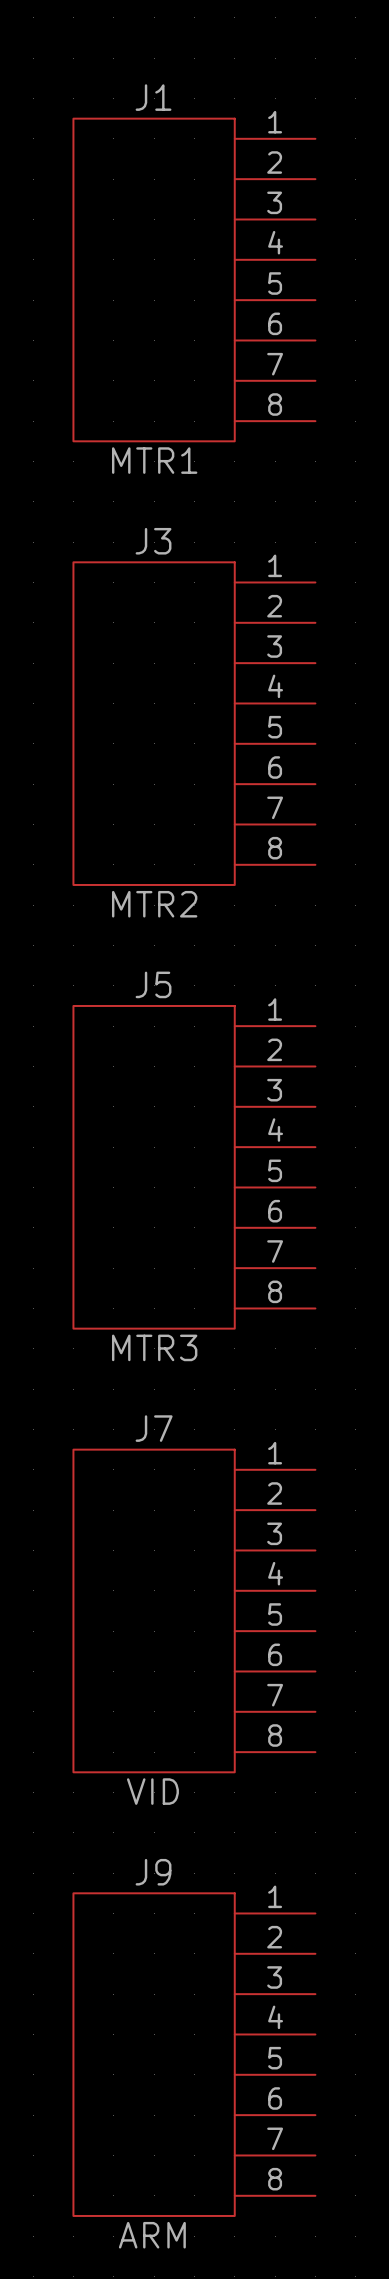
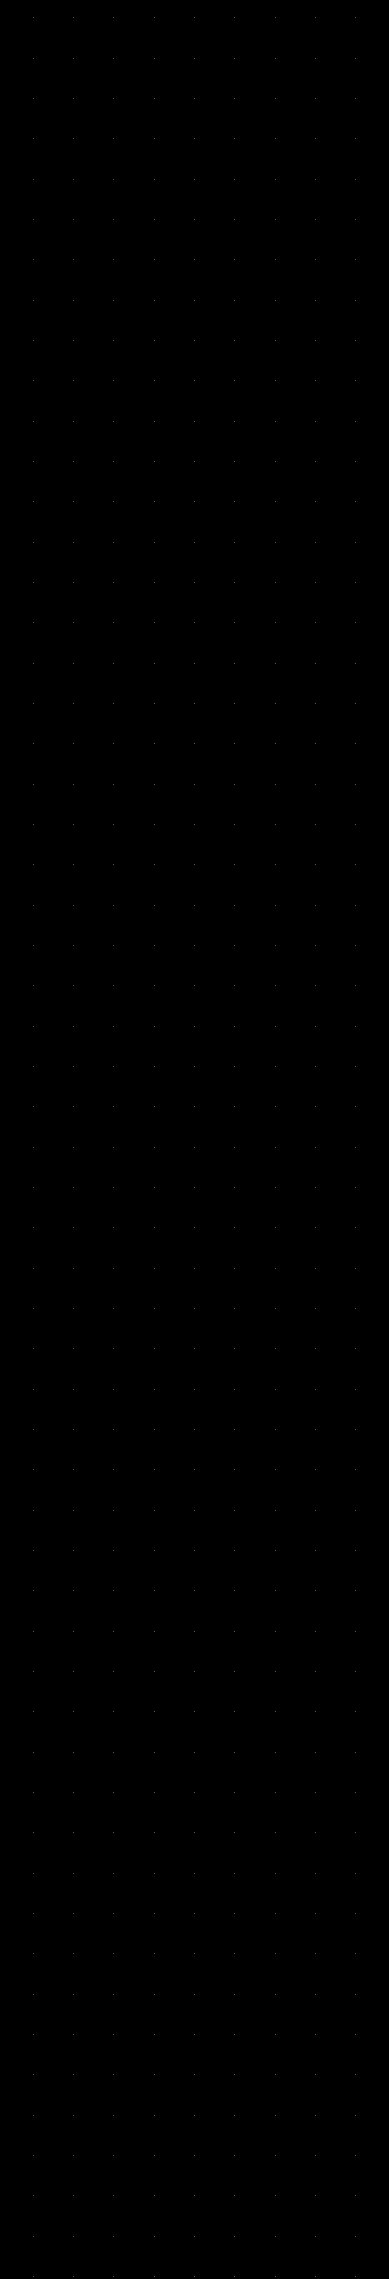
J1: MTR1 (194, 279) -> none
J3: MTR2 (194, 723) -> none
J5: MTR3 (194, 1167) -> none
J7: VID (194, 1610) -> none
J9: ARM (194, 2054) -> none

